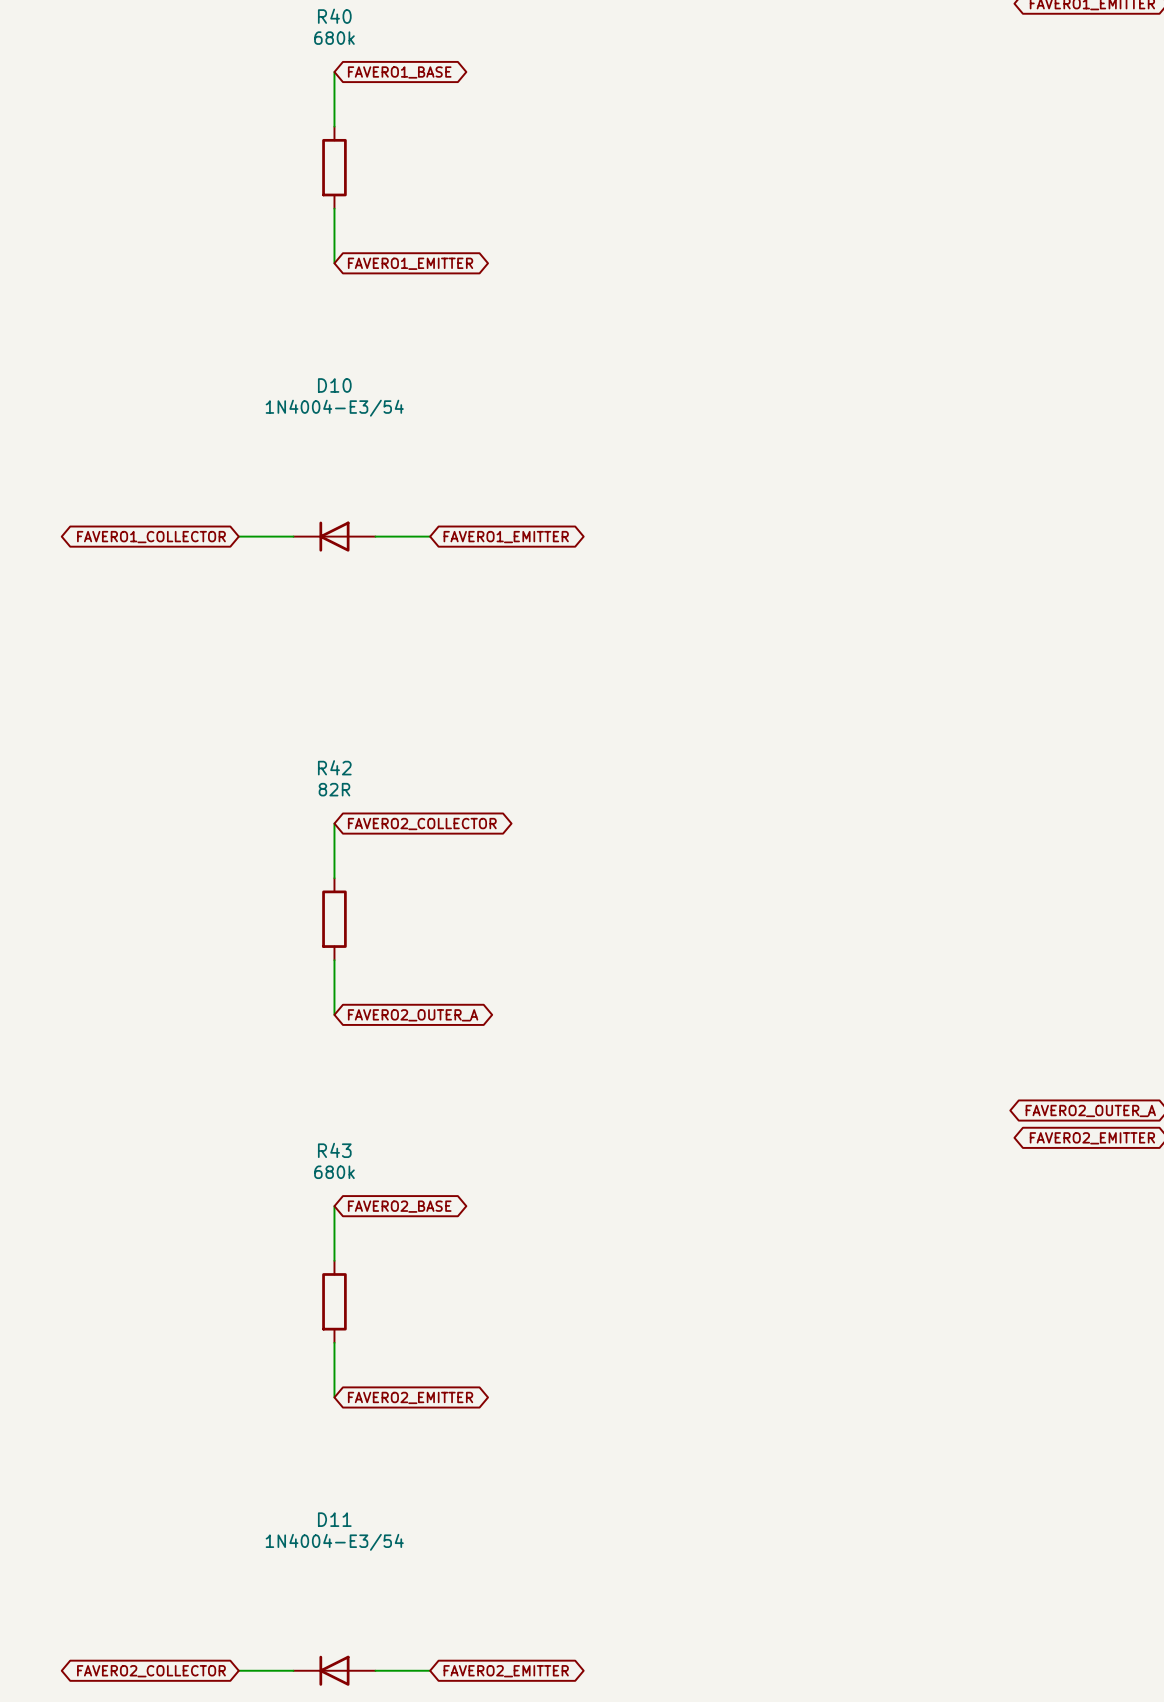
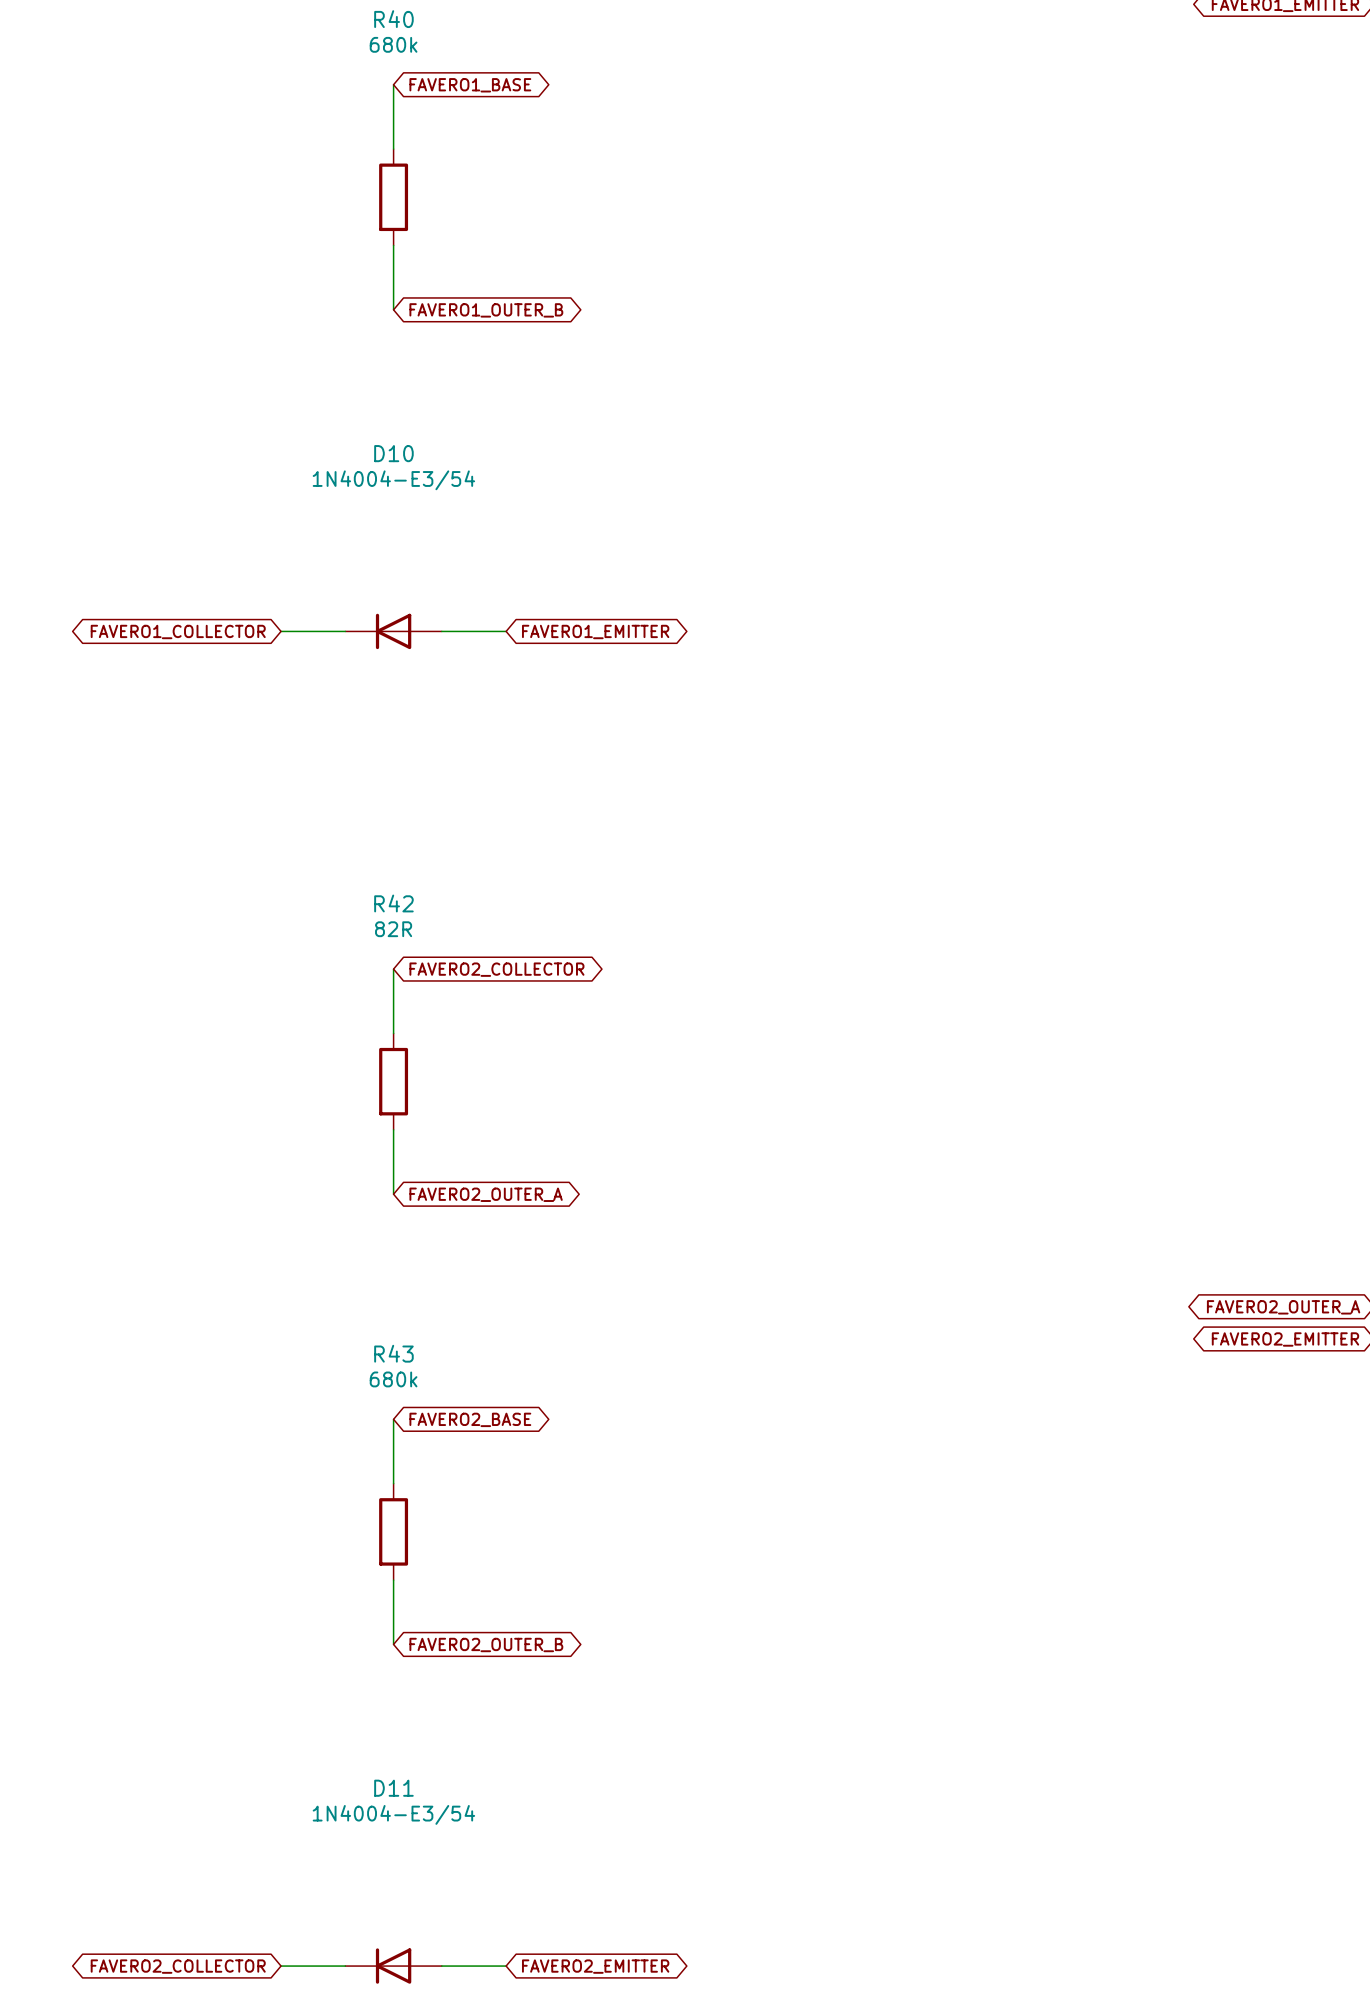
global label: FAVERO1_EMITTER (410, 263) -> FAVERO1_OUTER_B (486, 310)
global label: FAVERO2_EMITTER (410, 1397) -> FAVERO2_OUTER_B (486, 1645)

